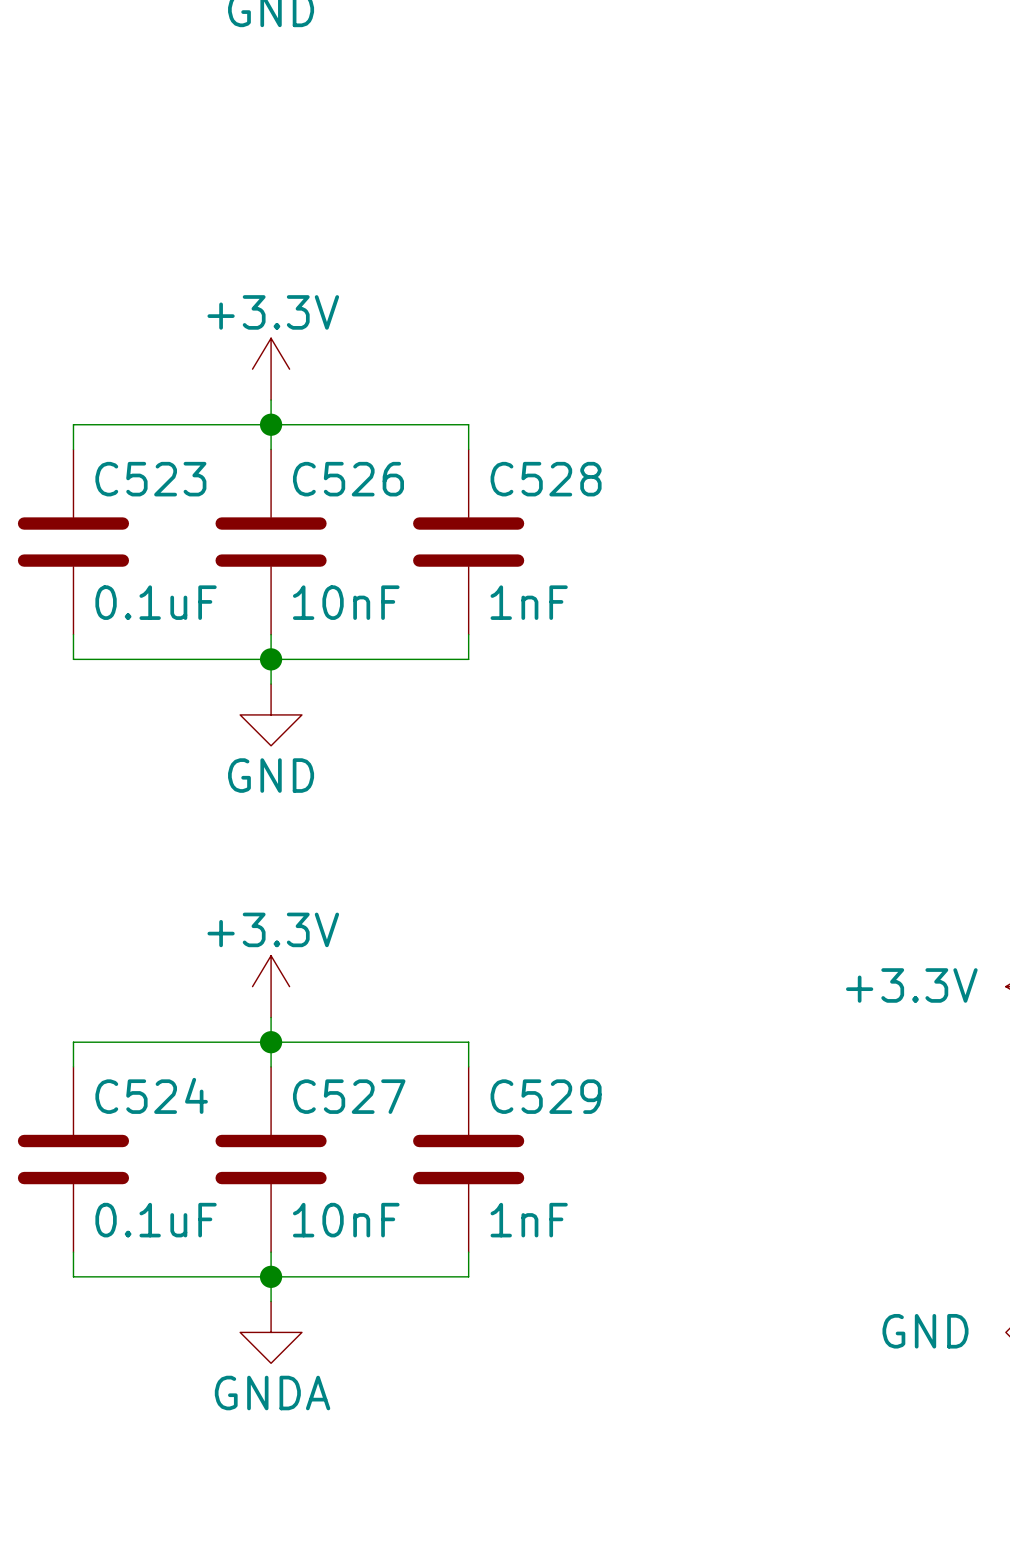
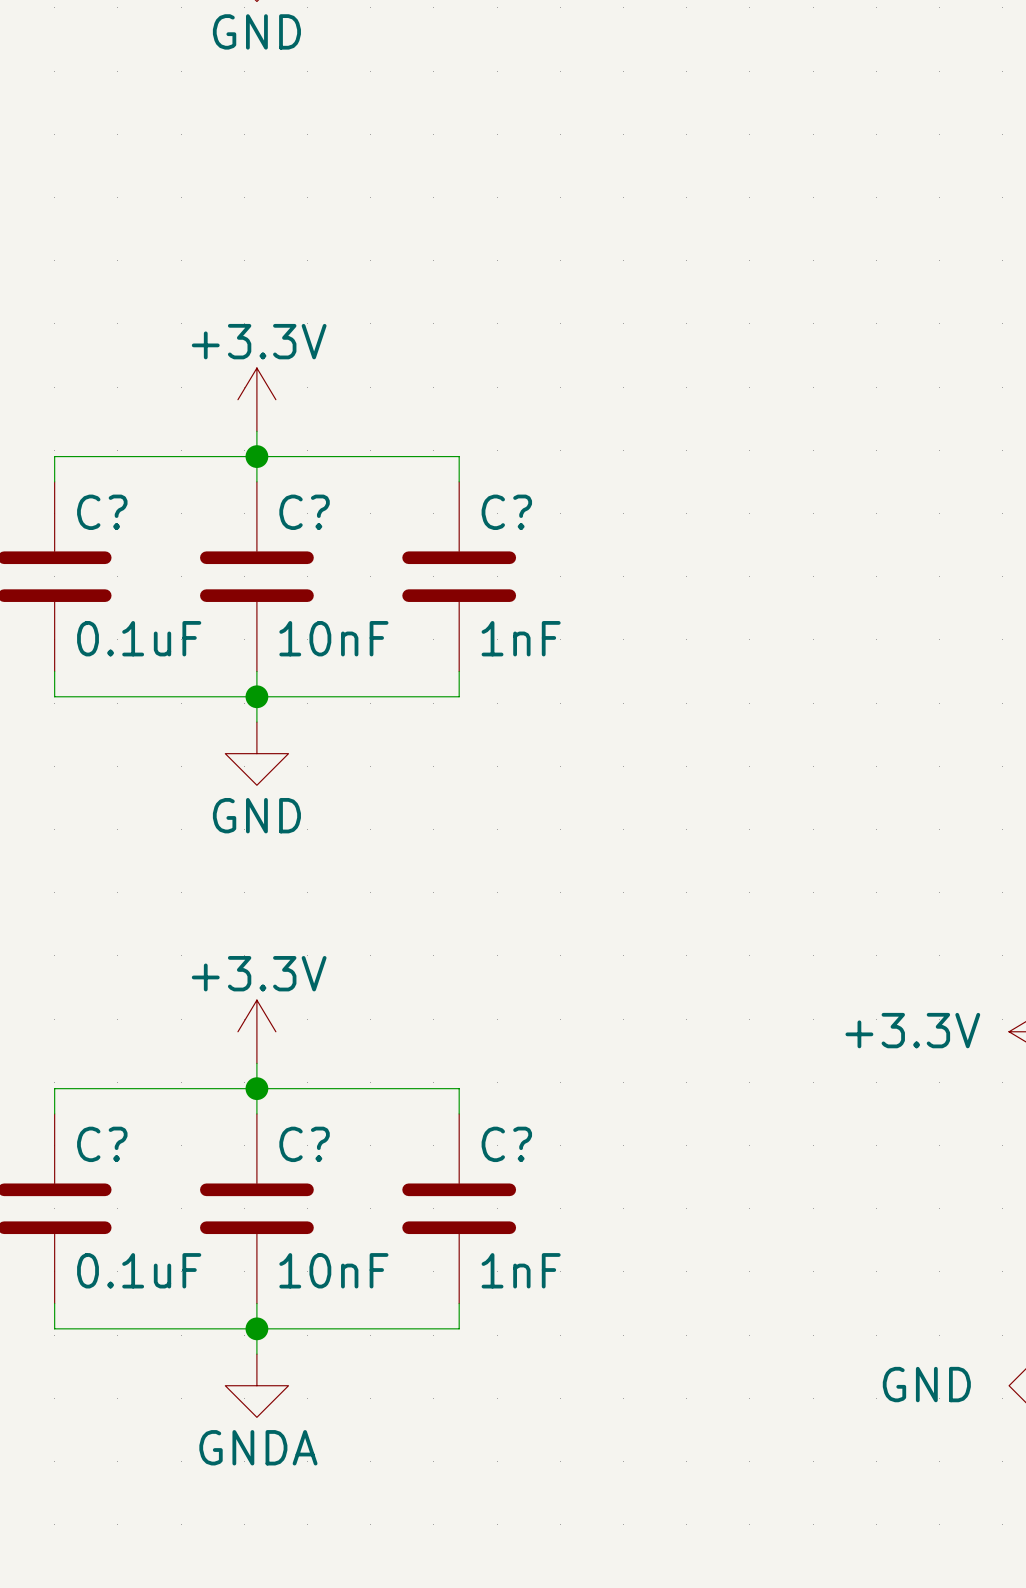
C523 name: C523 (150, 479) -> C? (102, 512)
C526 name: C526 (348, 479) -> C? (304, 512)
C528 name: C528 (546, 479) -> C? (506, 512)
C524 name: C524 (151, 1095) -> C? (102, 1144)
C527 name: C527 (349, 1096) -> C? (304, 1144)
C529 name: C529 (546, 1096) -> C? (506, 1144)

